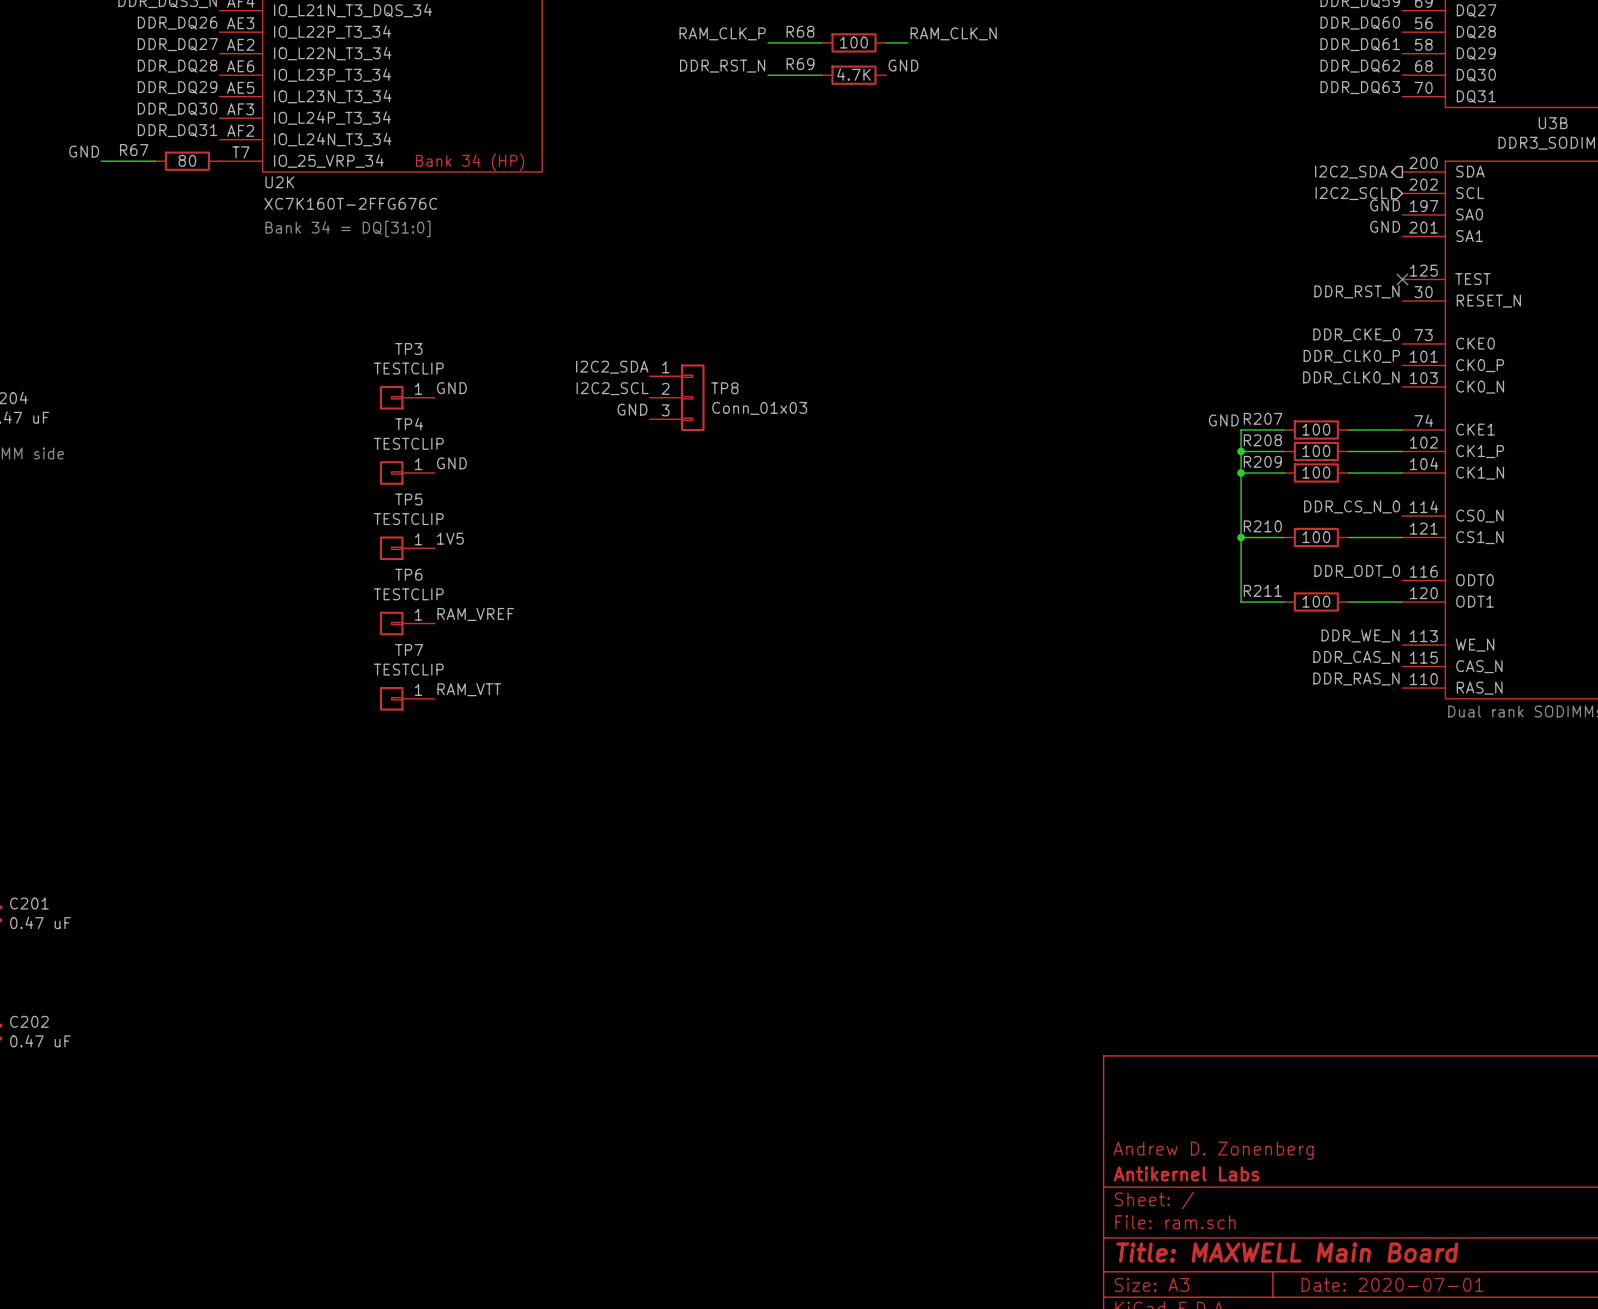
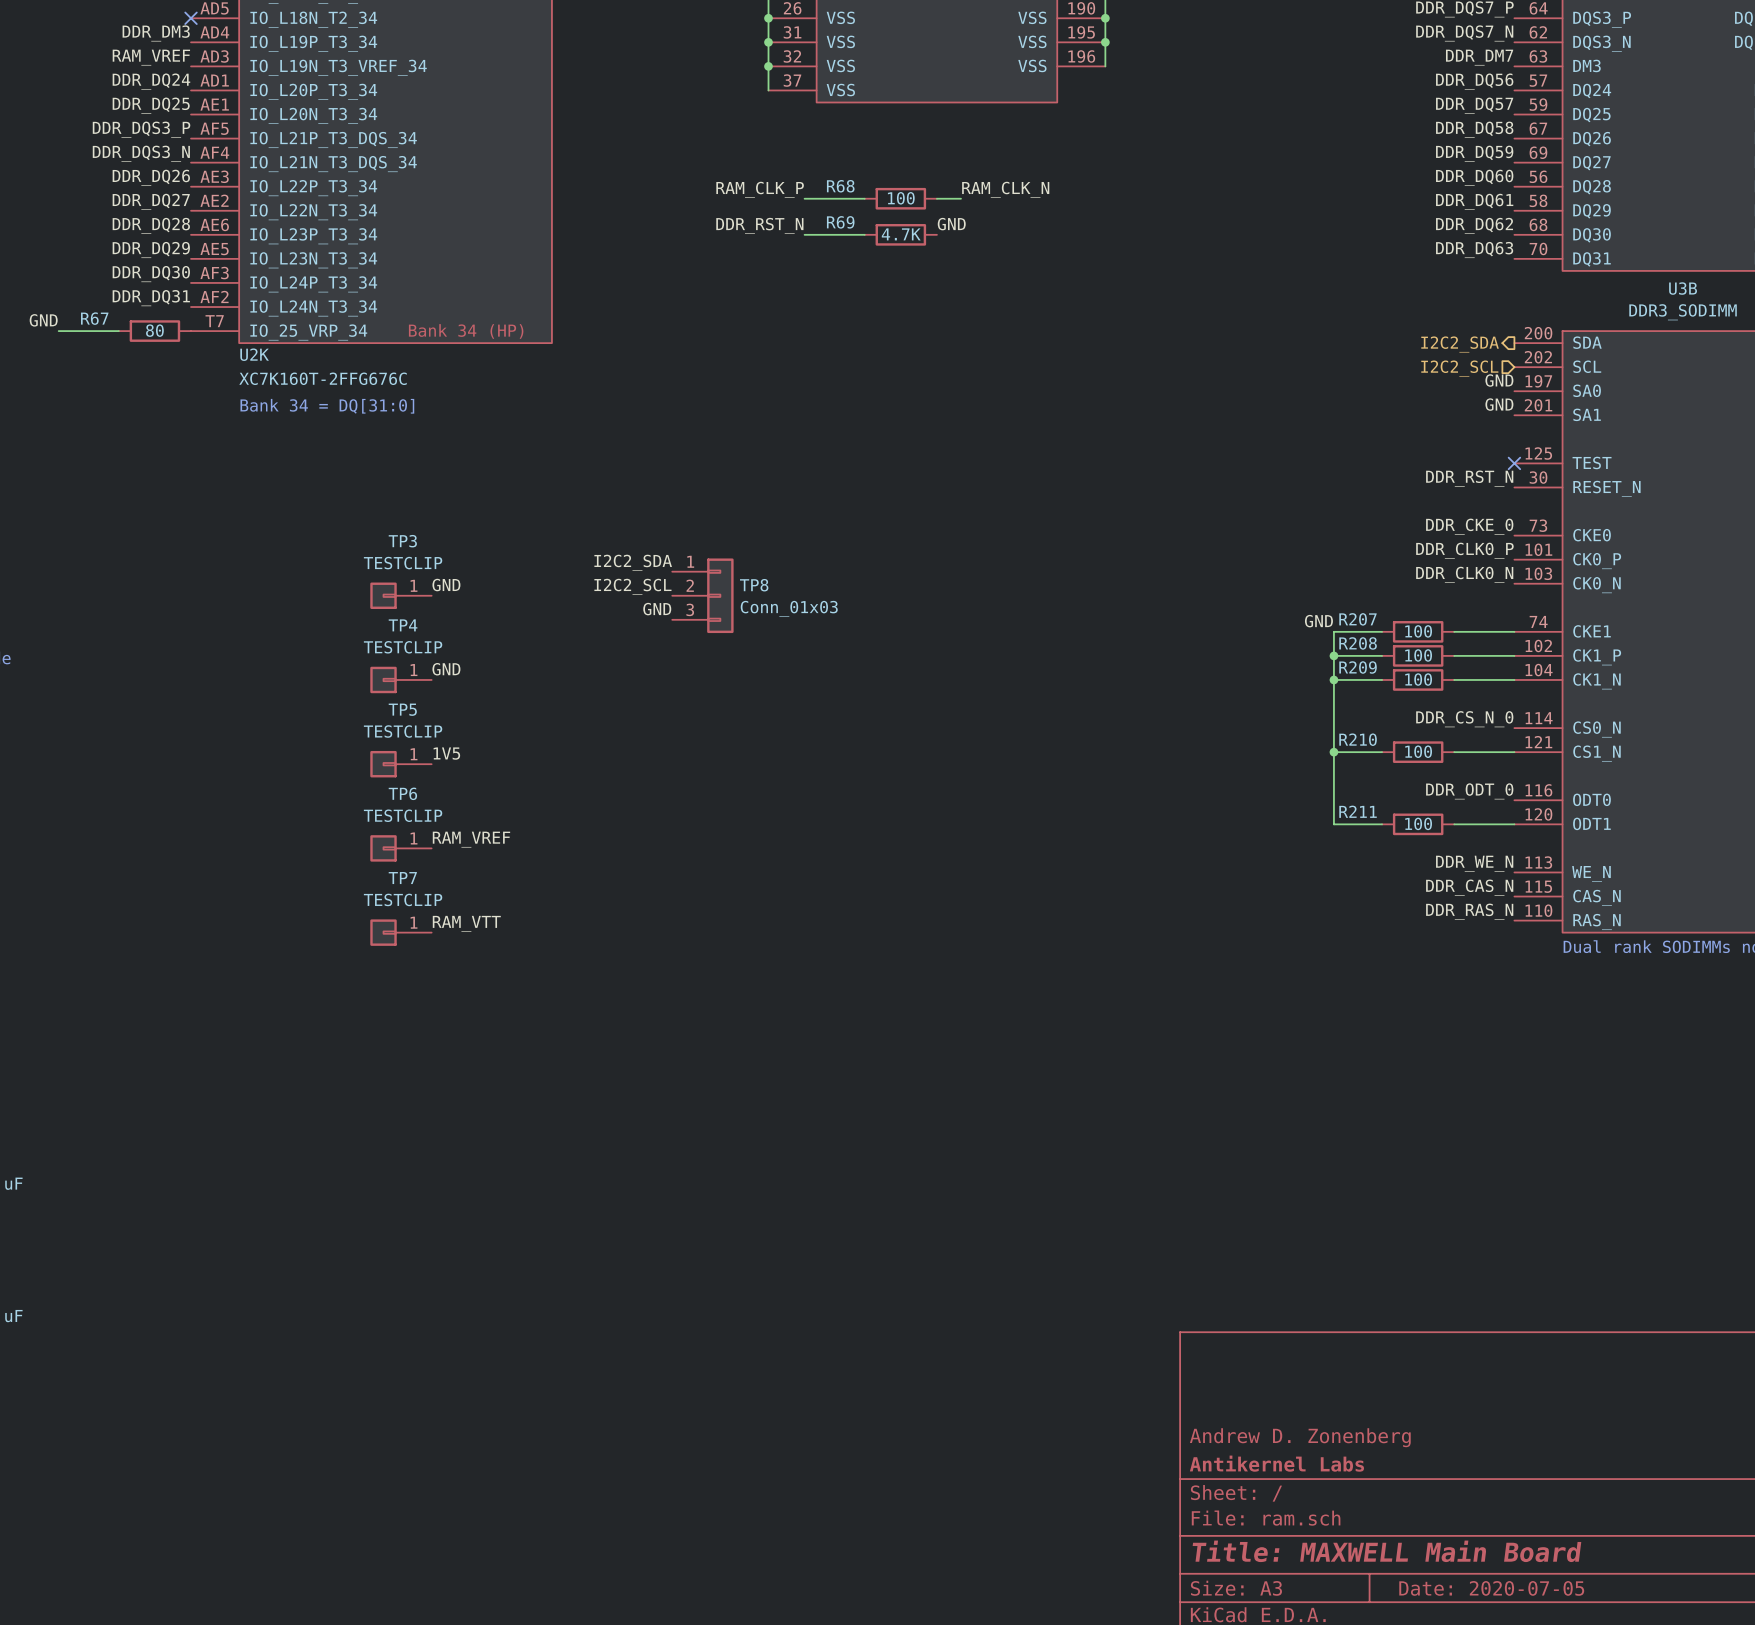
title block: Date: 2020-07-01 (1392, 1284) -> Date: 2020-07-05 (1491, 1588)

